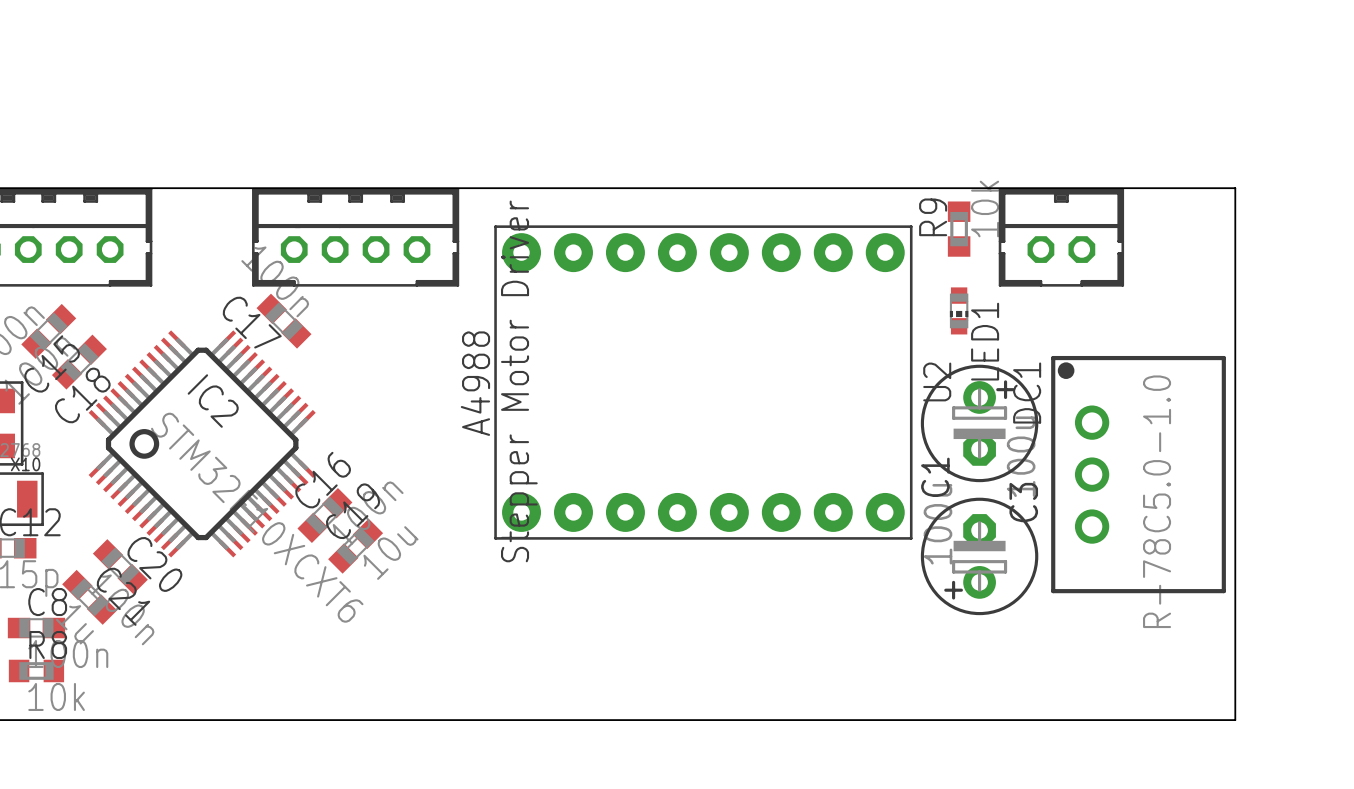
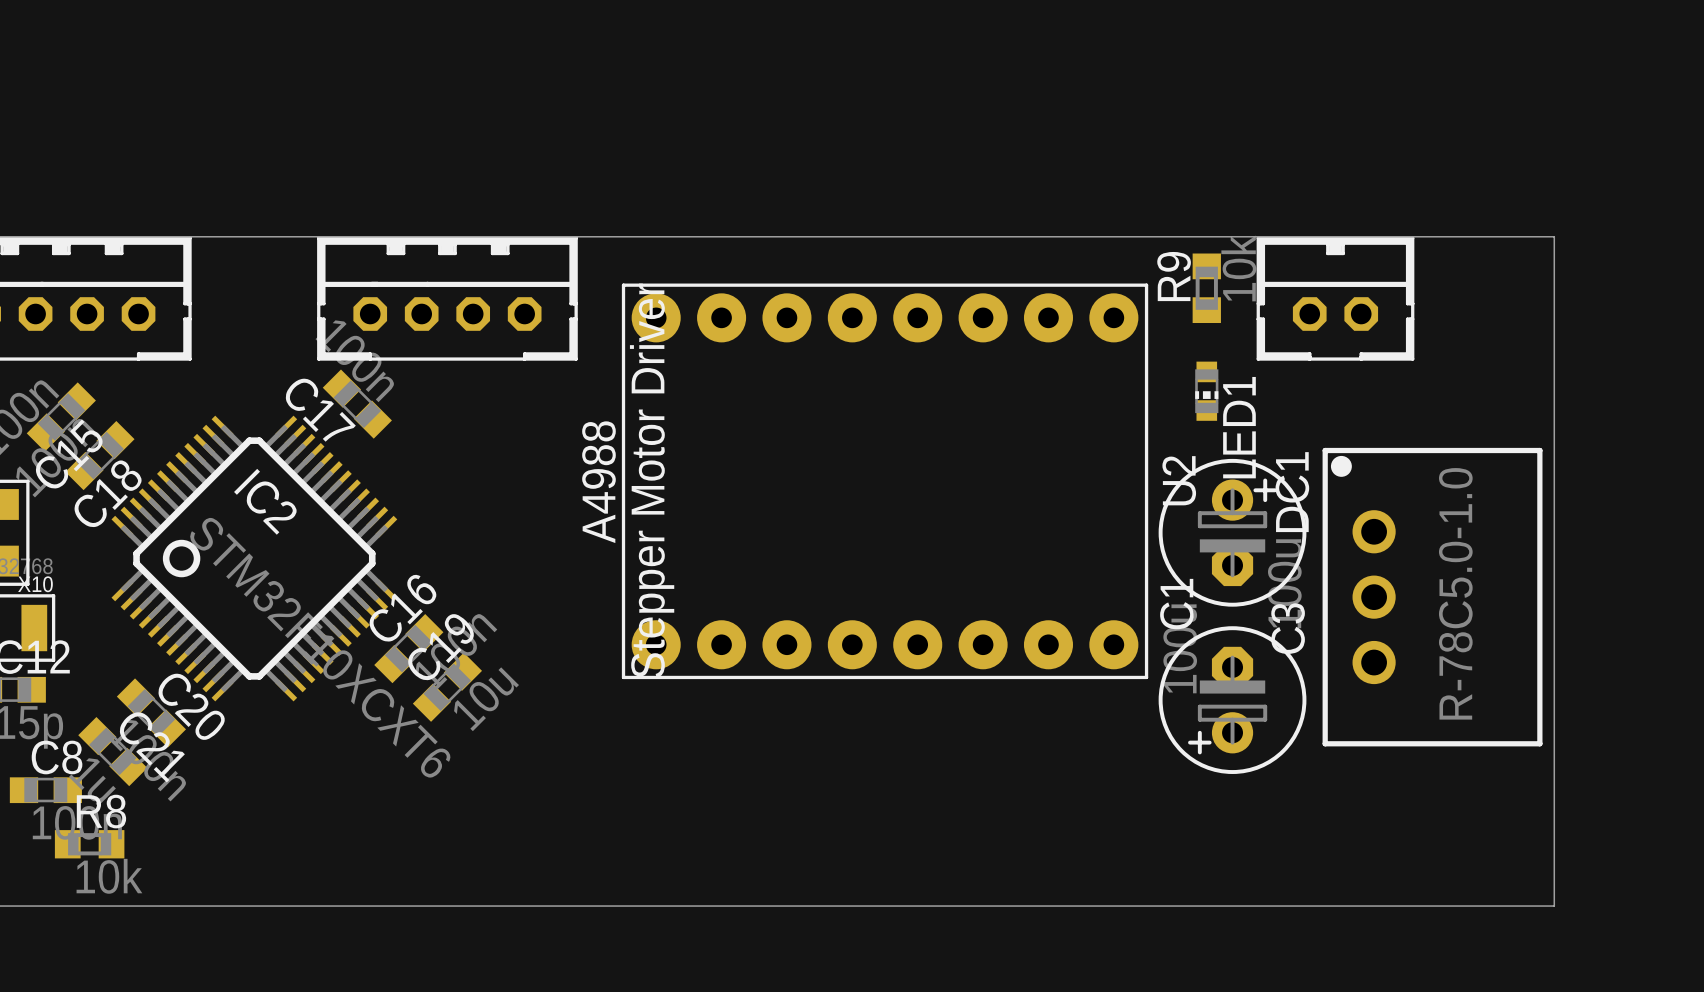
R8 position: (36, 670) -> (89, 844)

